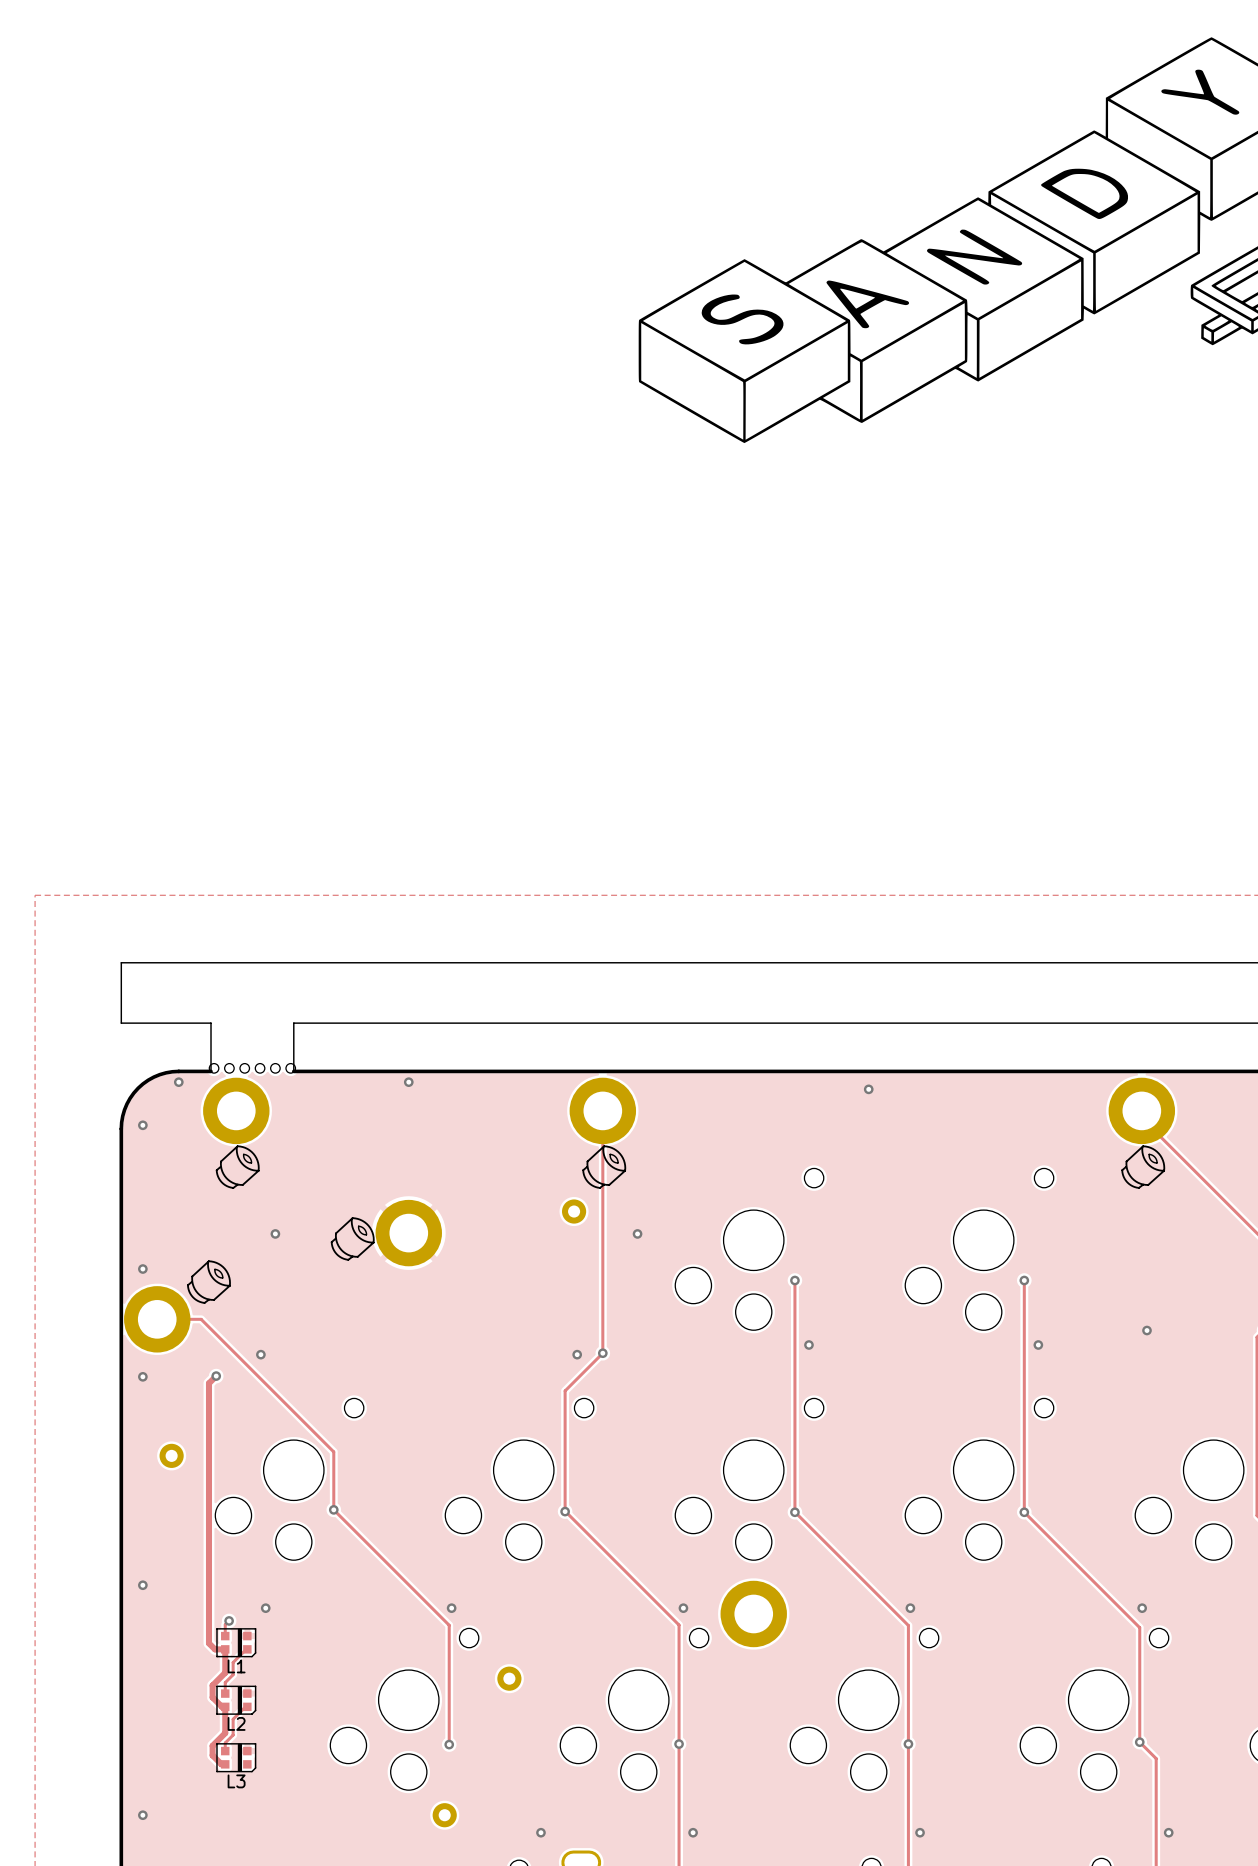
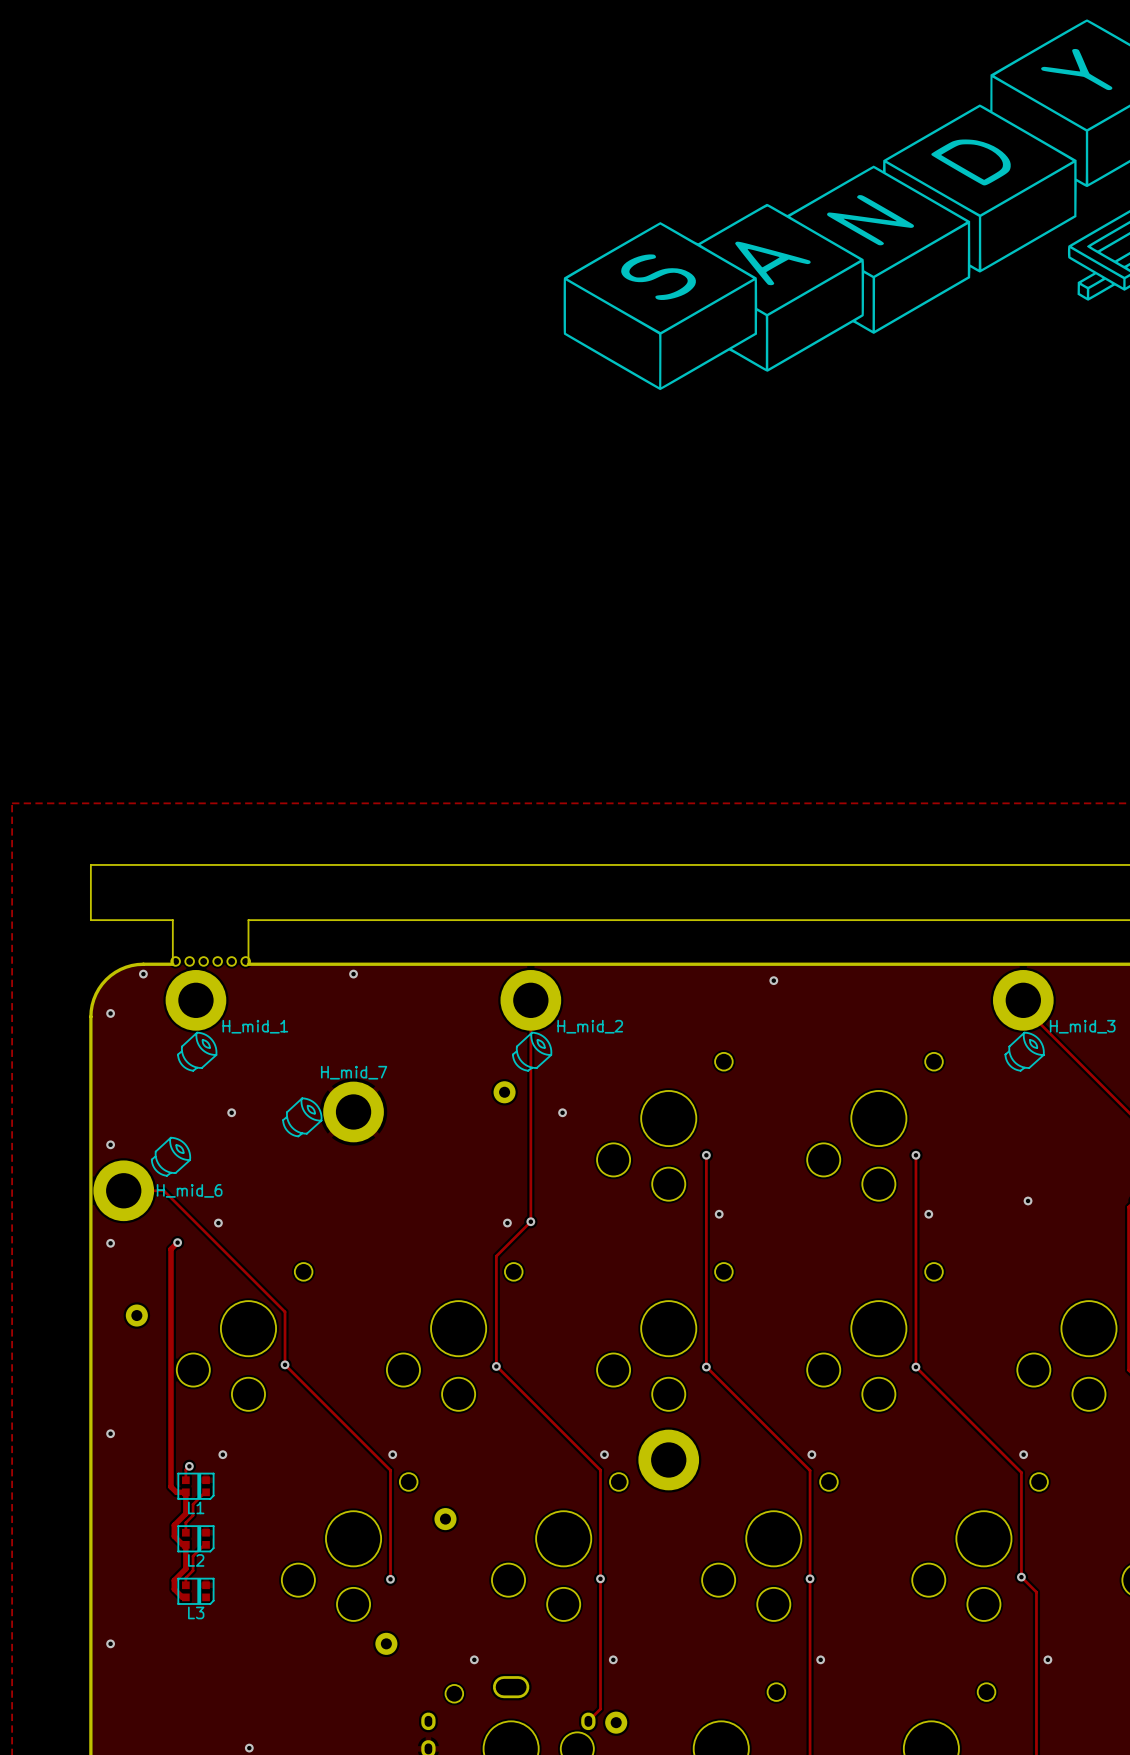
H_mid_1 name: none -> H_mid_1 (255, 1026)
H_mid_2 name: none -> H_mid_2 (590, 1026)
H_mid_3 name: none -> H_mid_3 (1082, 1026)
H_mid_7 name: none -> H_mid_7 (354, 1072)
H_mid_6 name: none -> H_mid_6 (189, 1190)

